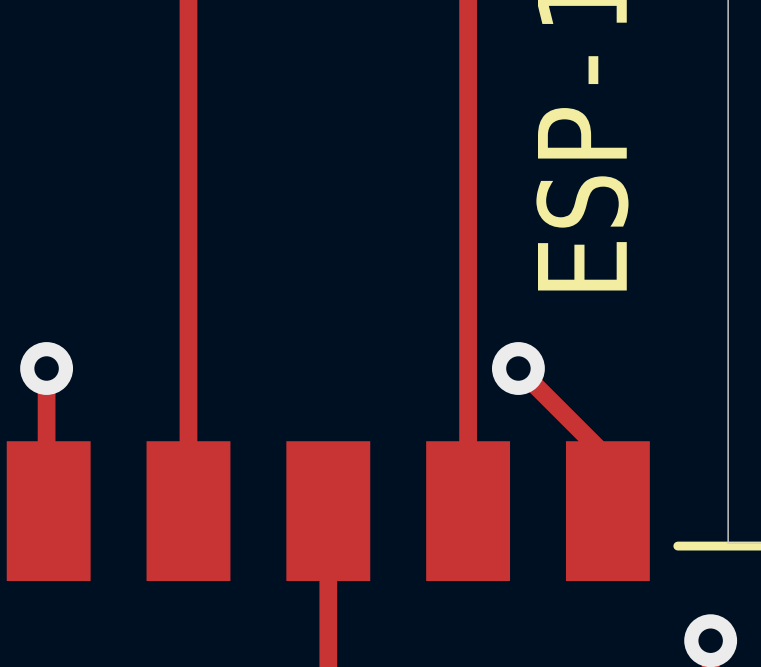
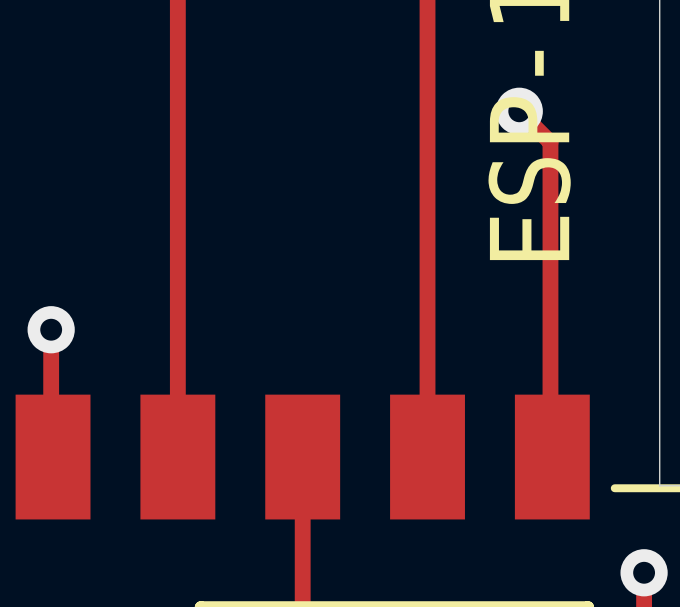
track: (518, 368) (605, 455) -> (519, 111) (550, 142) (550, 407)
via position: (518, 368) -> (519, 111)

